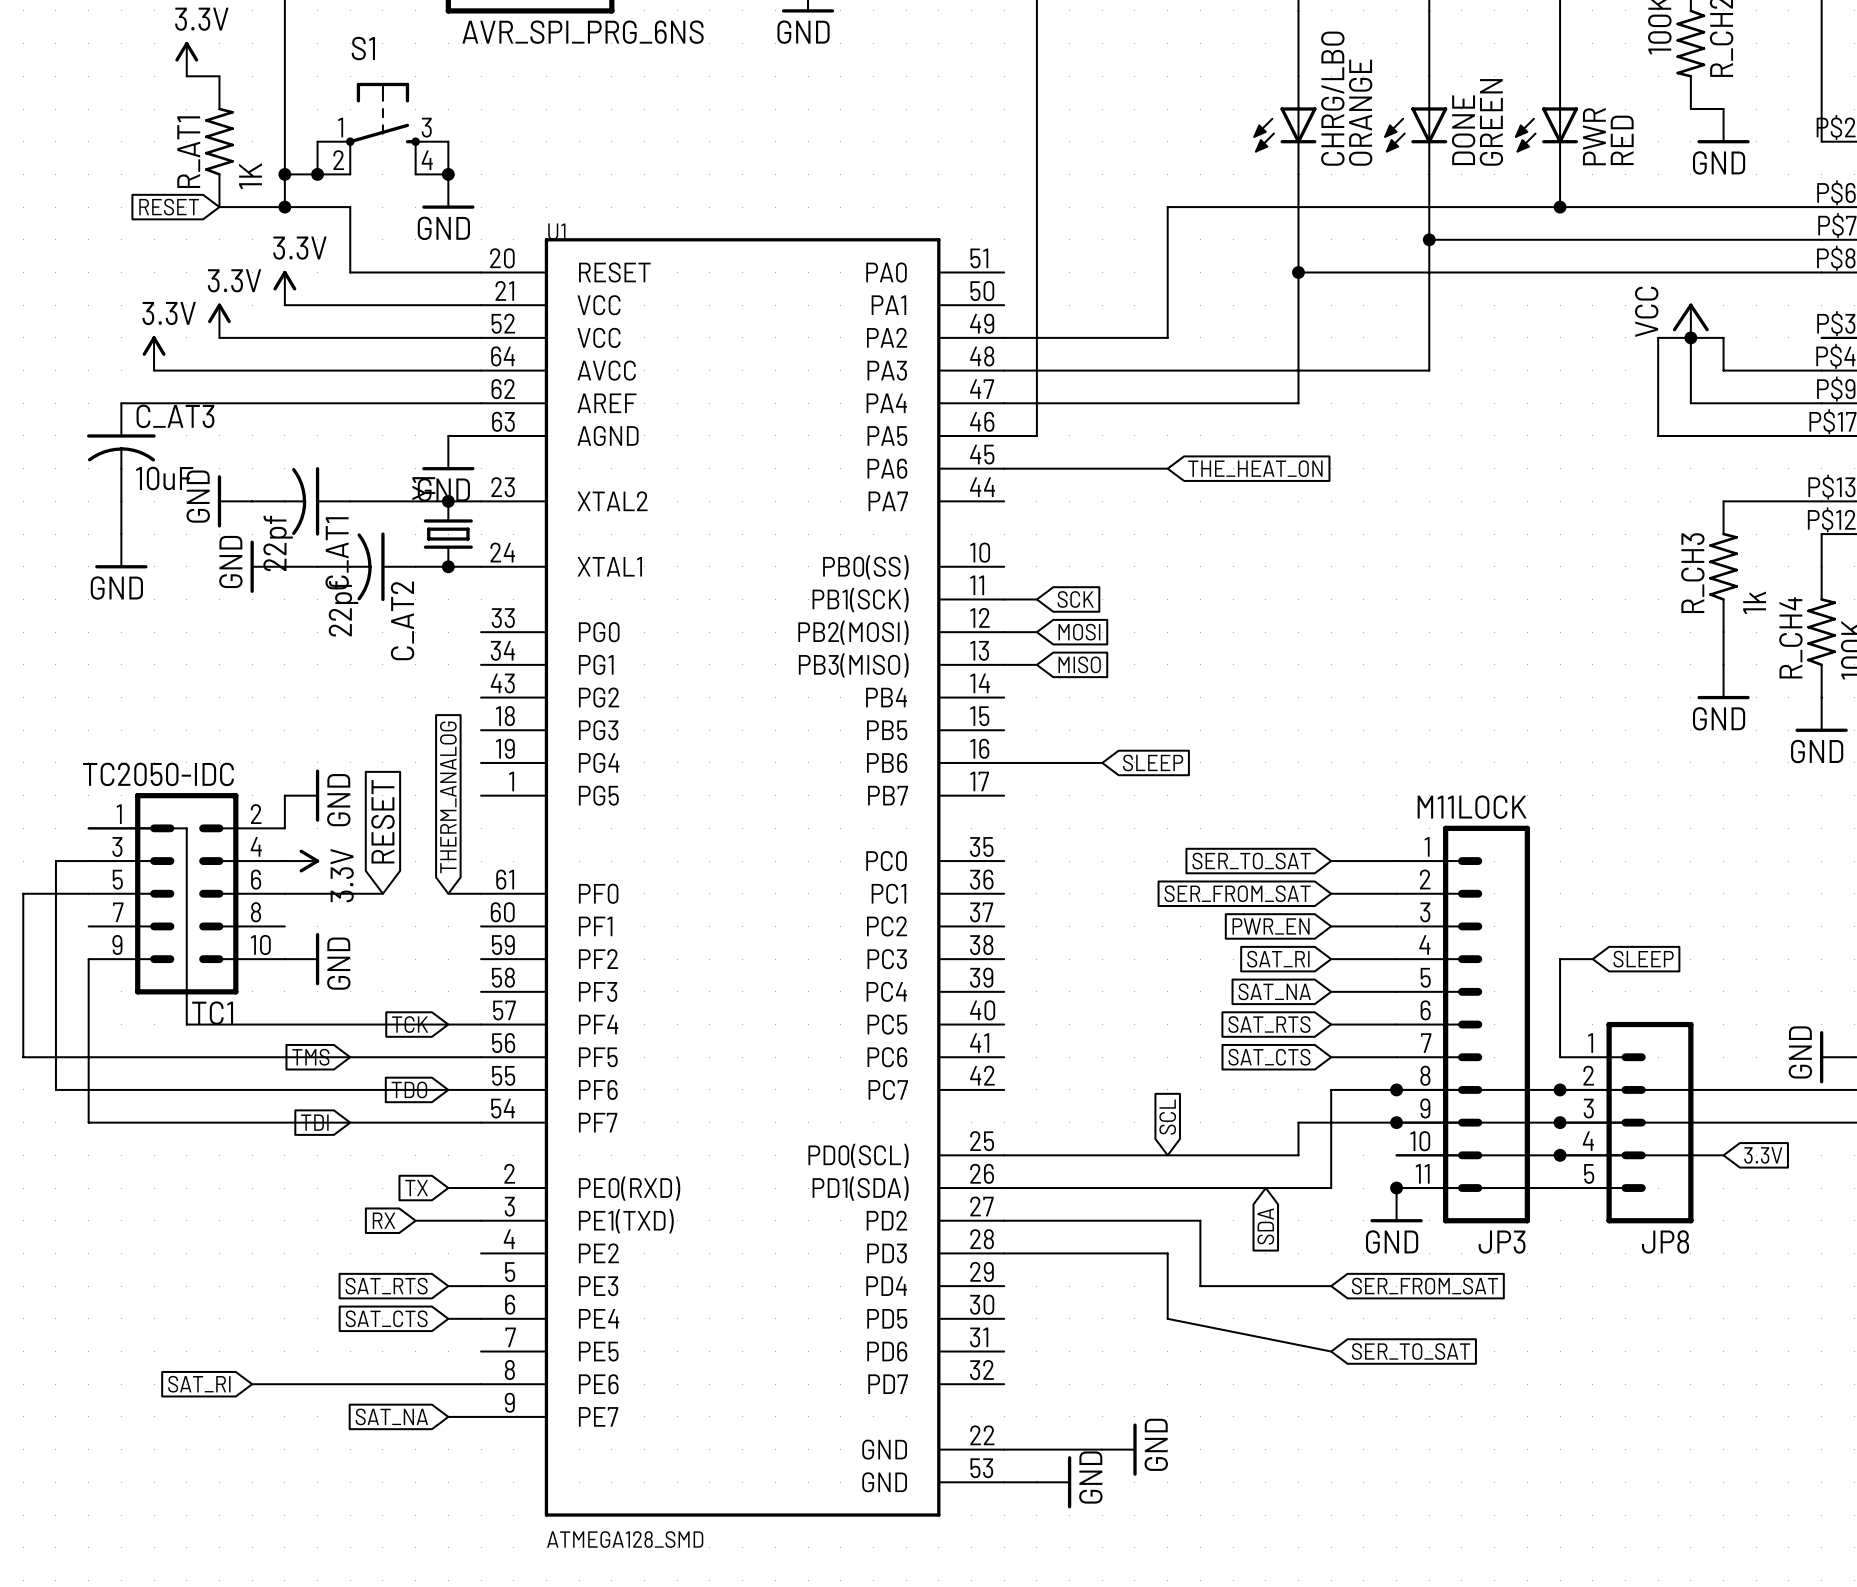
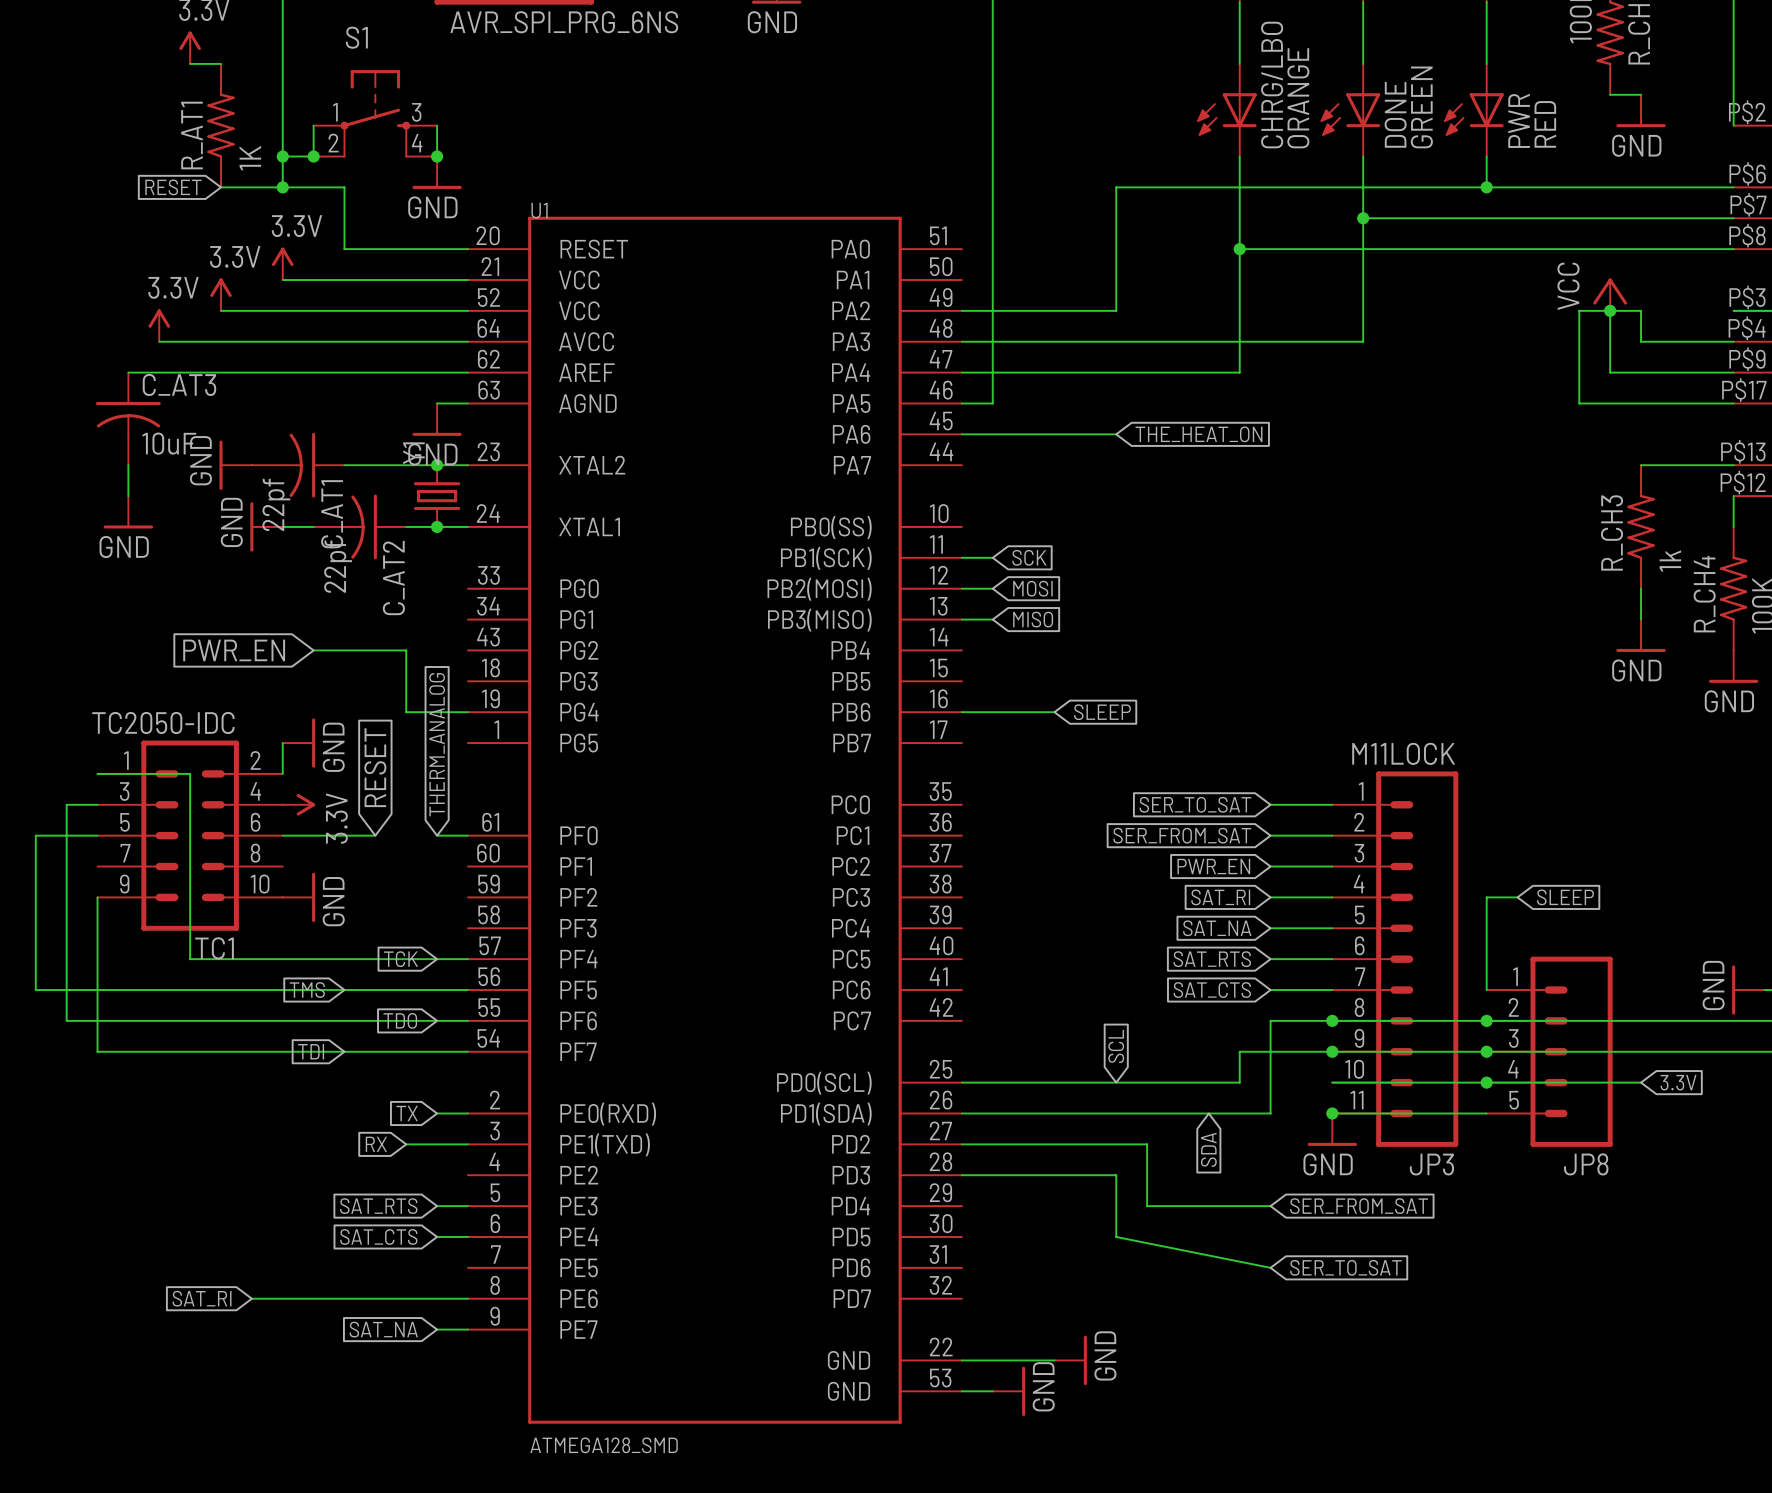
global label: none -> PWR_EN (234, 650)
wire: none -> (313, 650) (406, 650) (406, 712) (467, 712)

